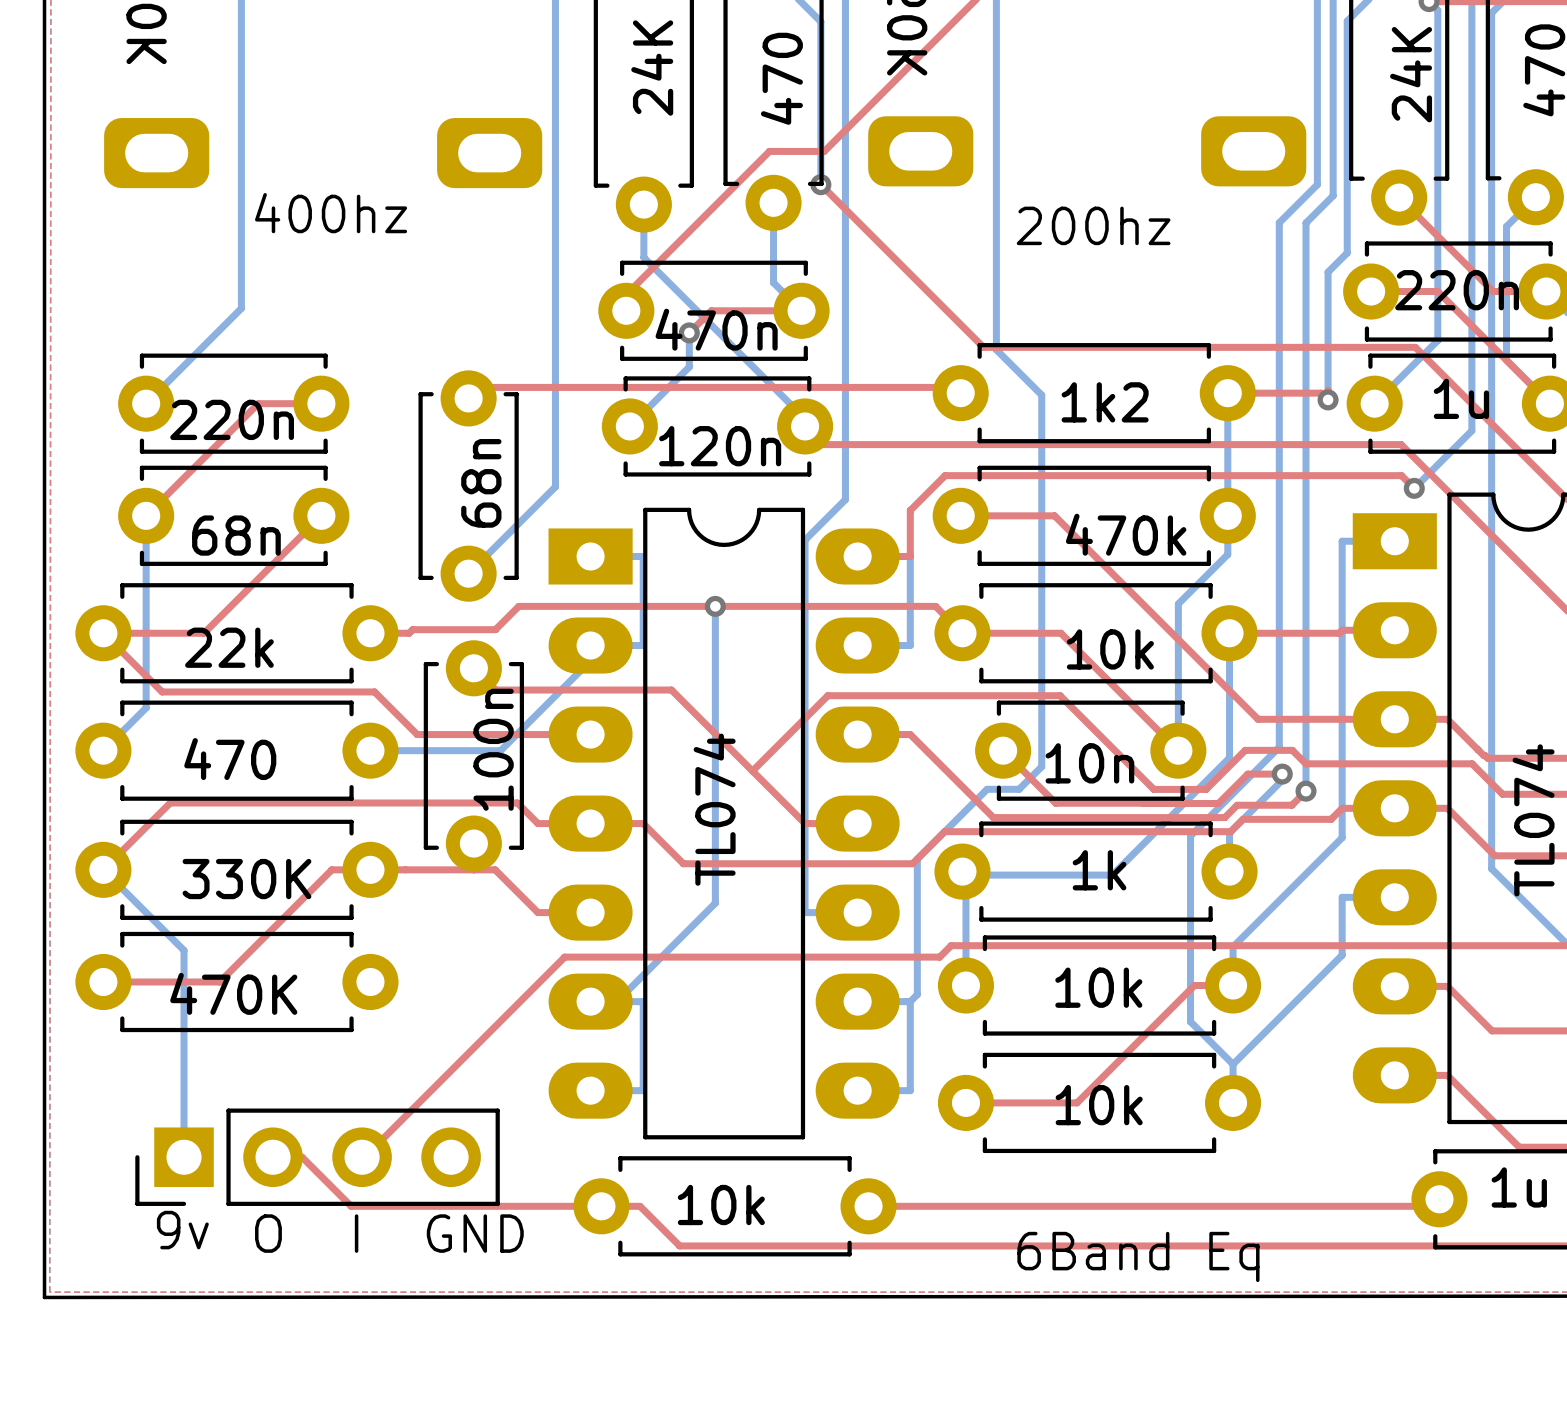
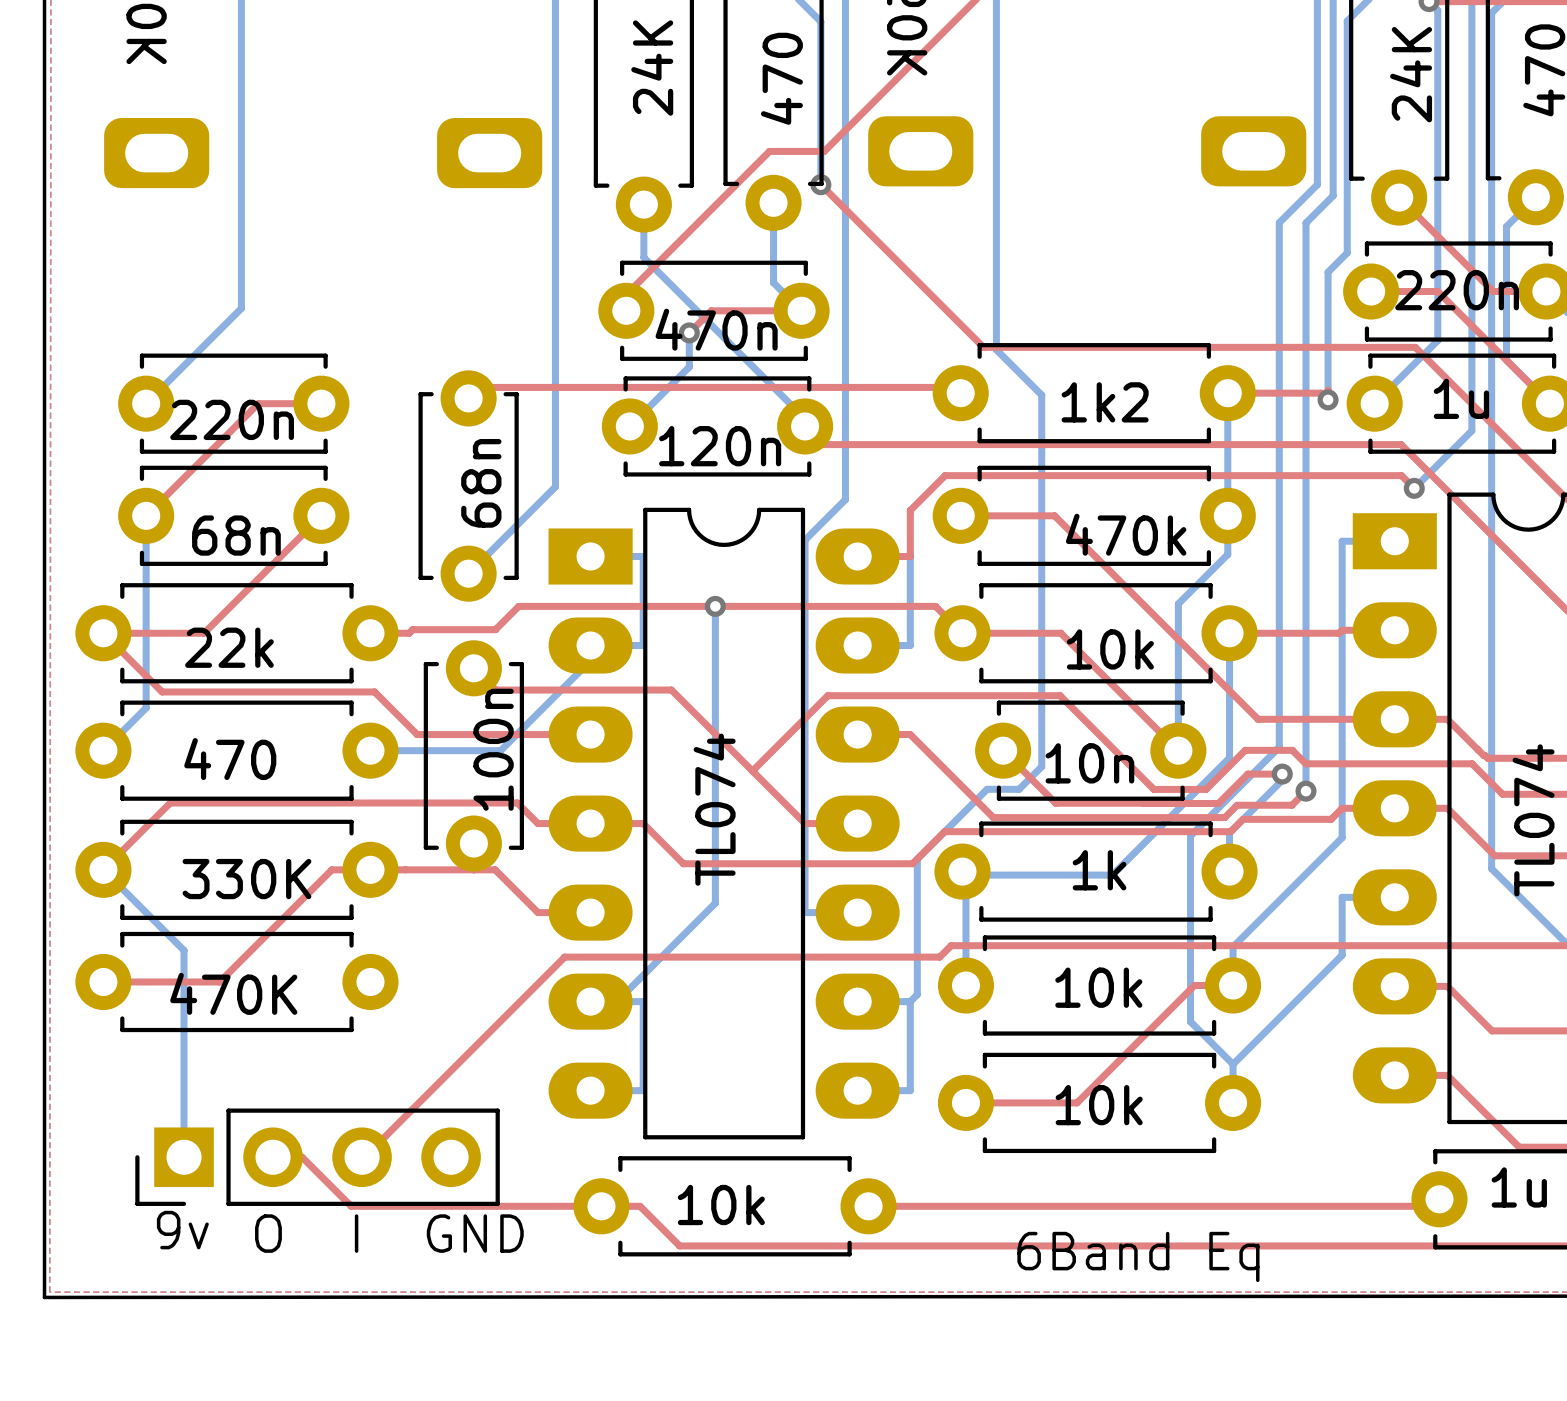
text: 400hz (331, 213) -> none
text: 200hz (1093, 225) -> none

